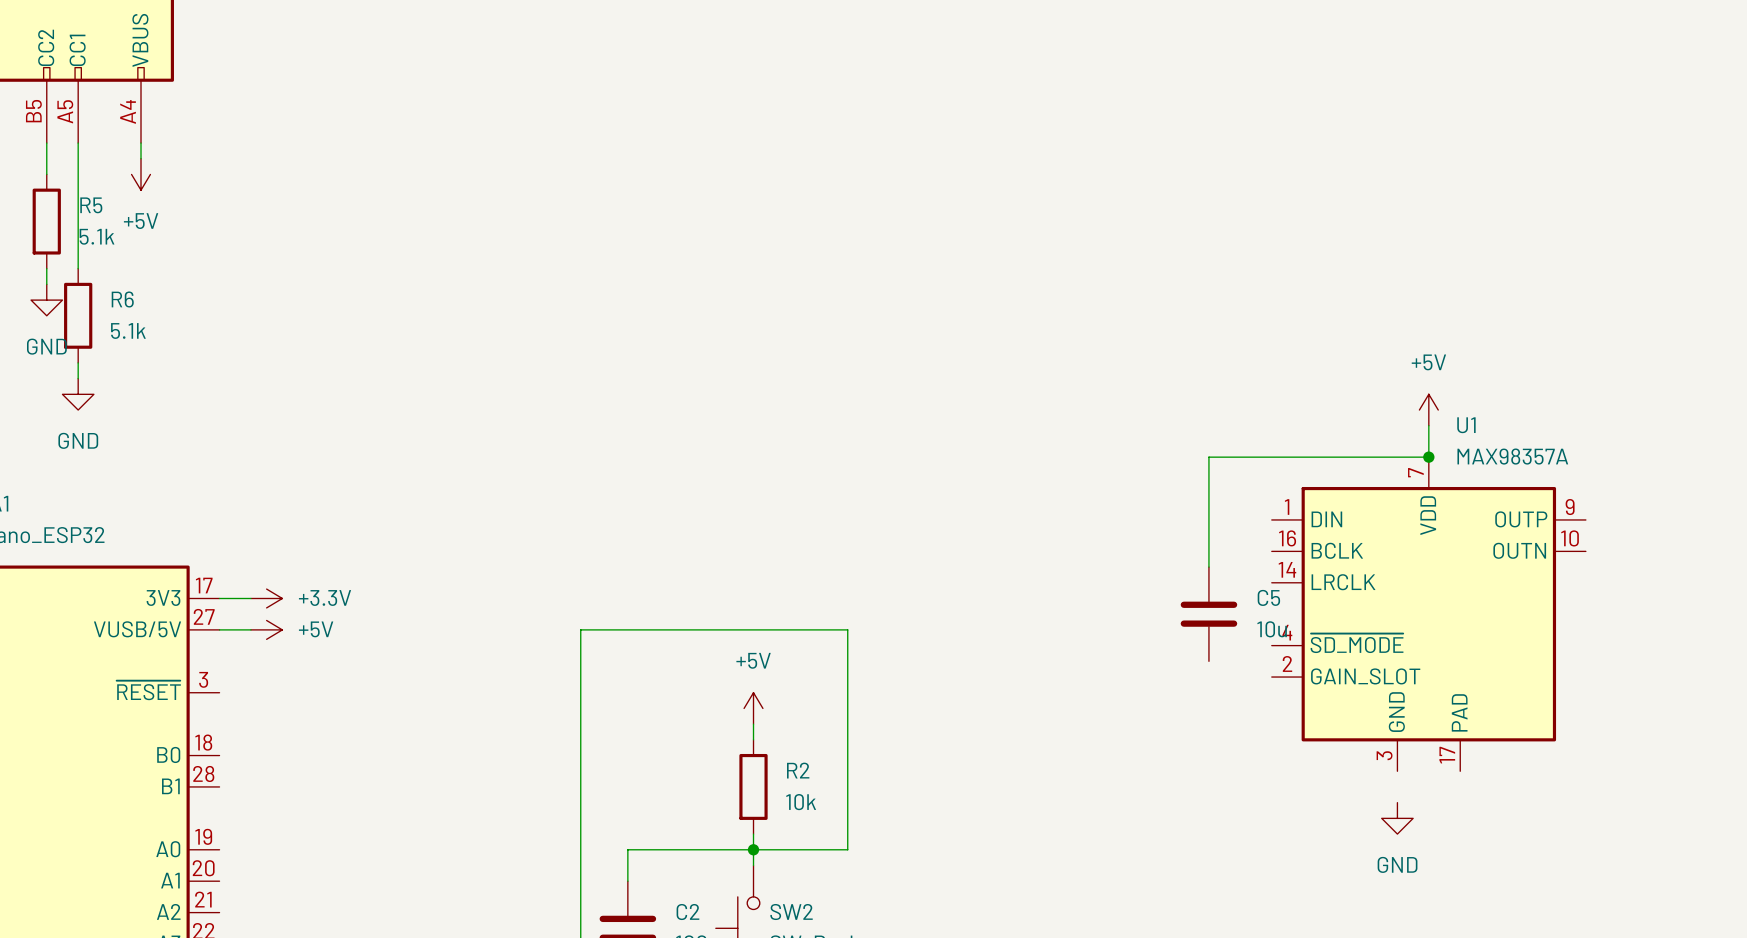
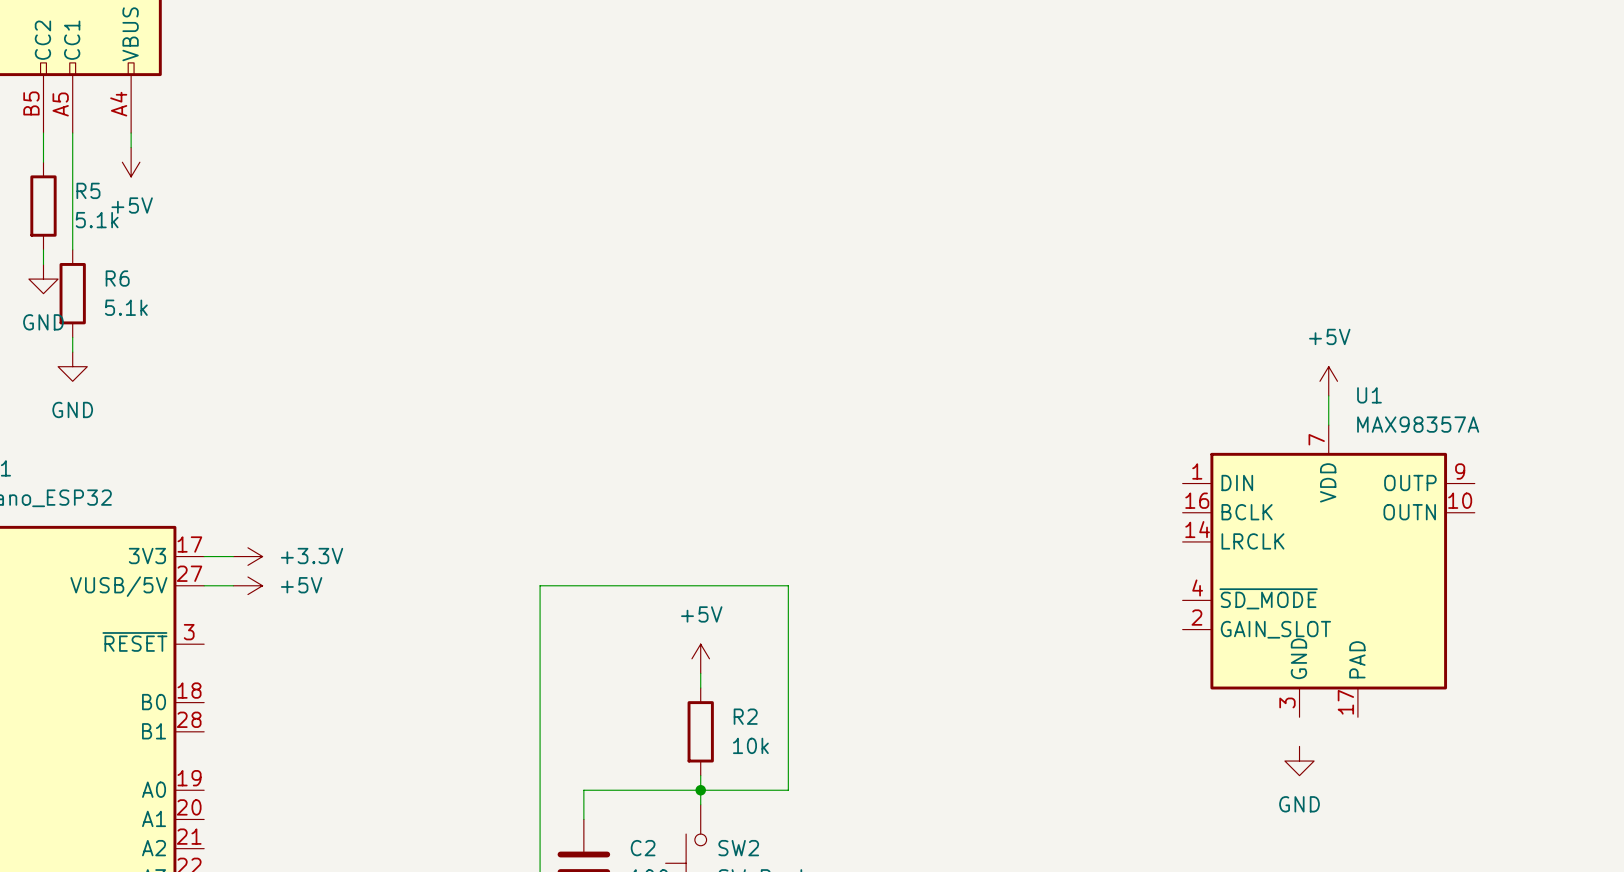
wire: (1428, 457) (1208, 457) (1208, 567) -> none
junction: (1428, 457) -> none
C5: 10u (1208, 614) -> none

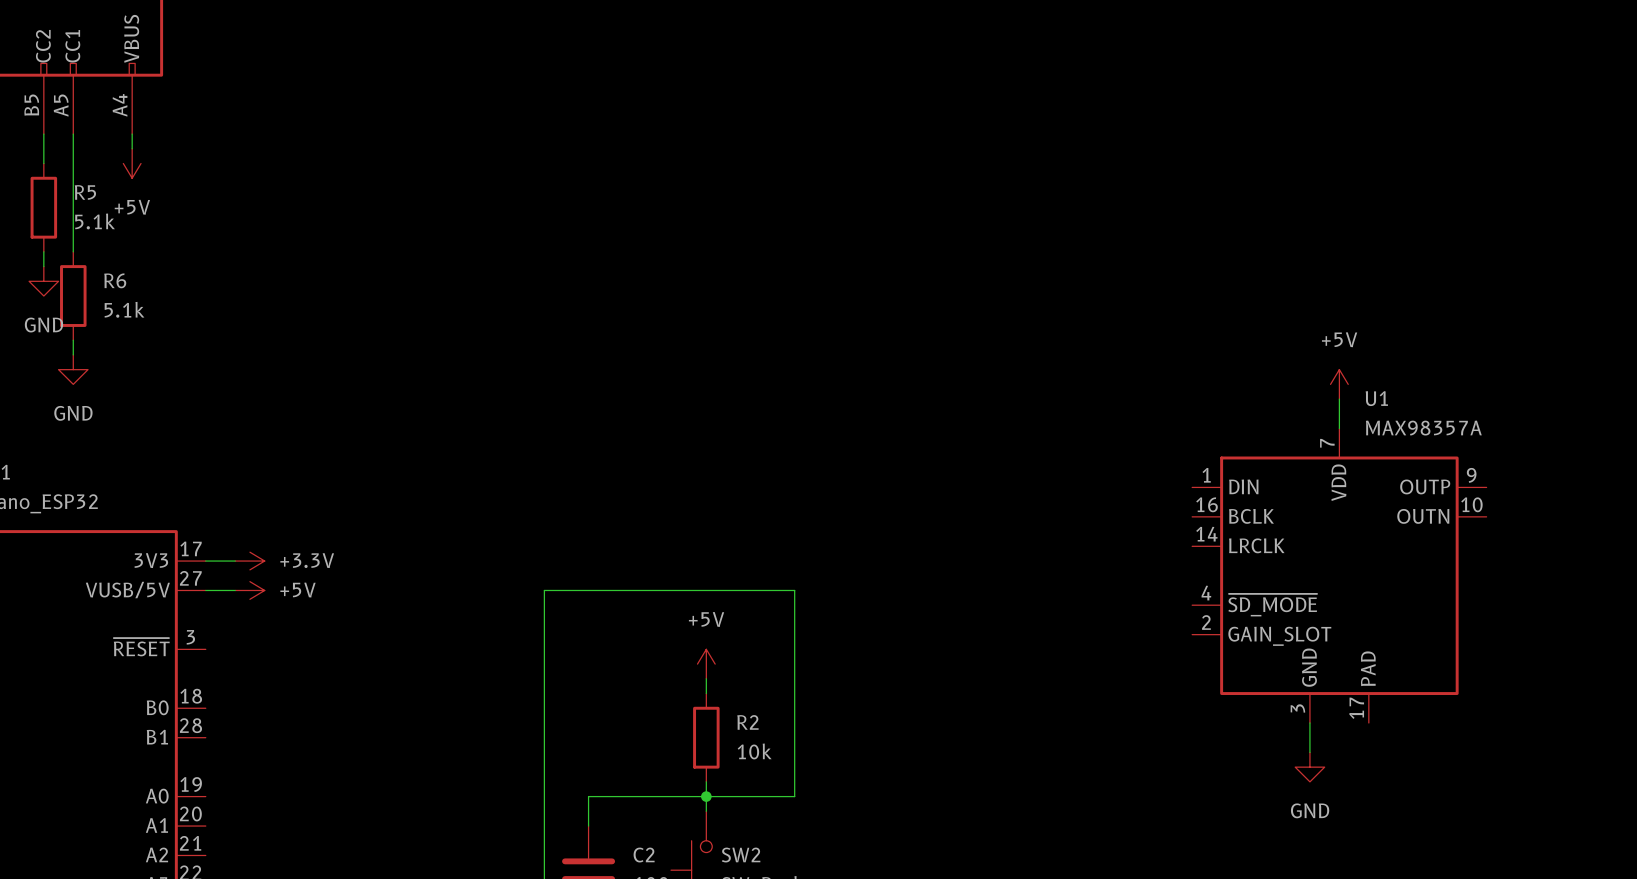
wire: none -> (1309, 722) (1309, 752)

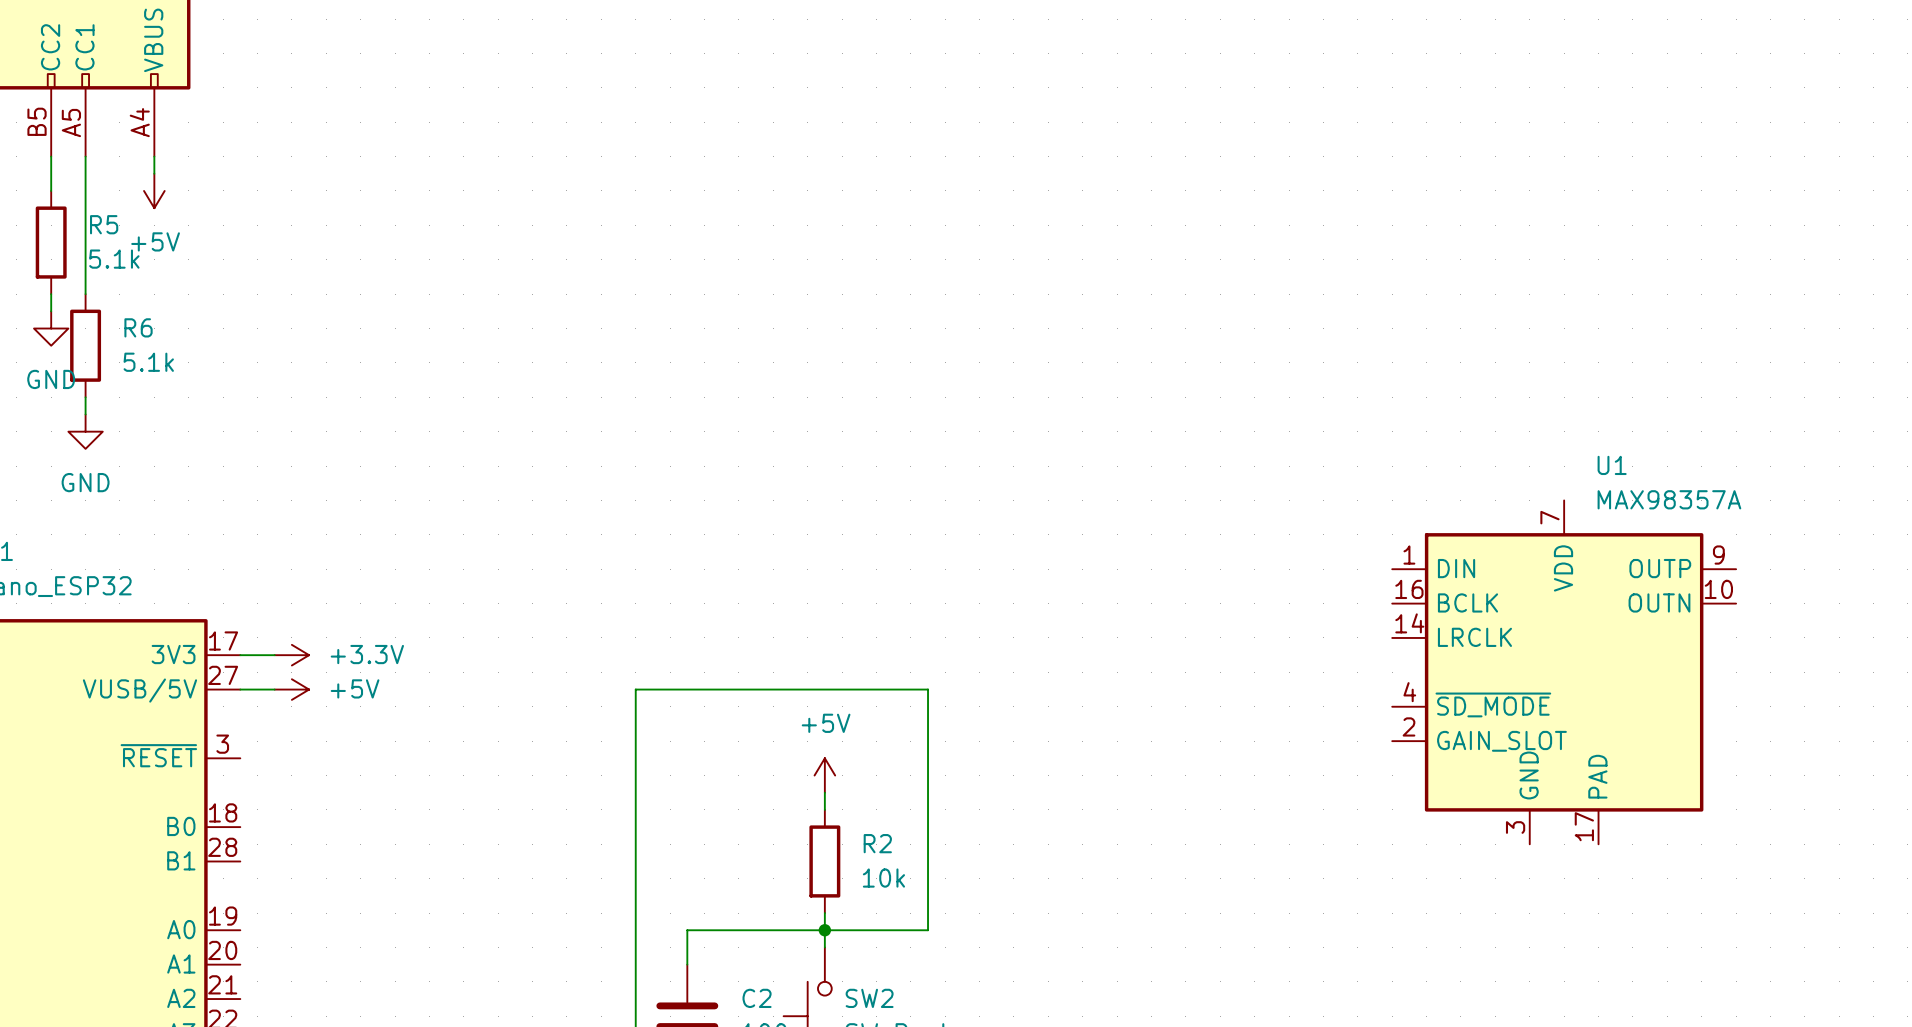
power symbol: +5V (1339, 384) -> none
wire: (1339, 399) (1339, 428) -> none
wire: (1309, 722) (1309, 752) -> none
power symbol: GND (1309, 767) -> none

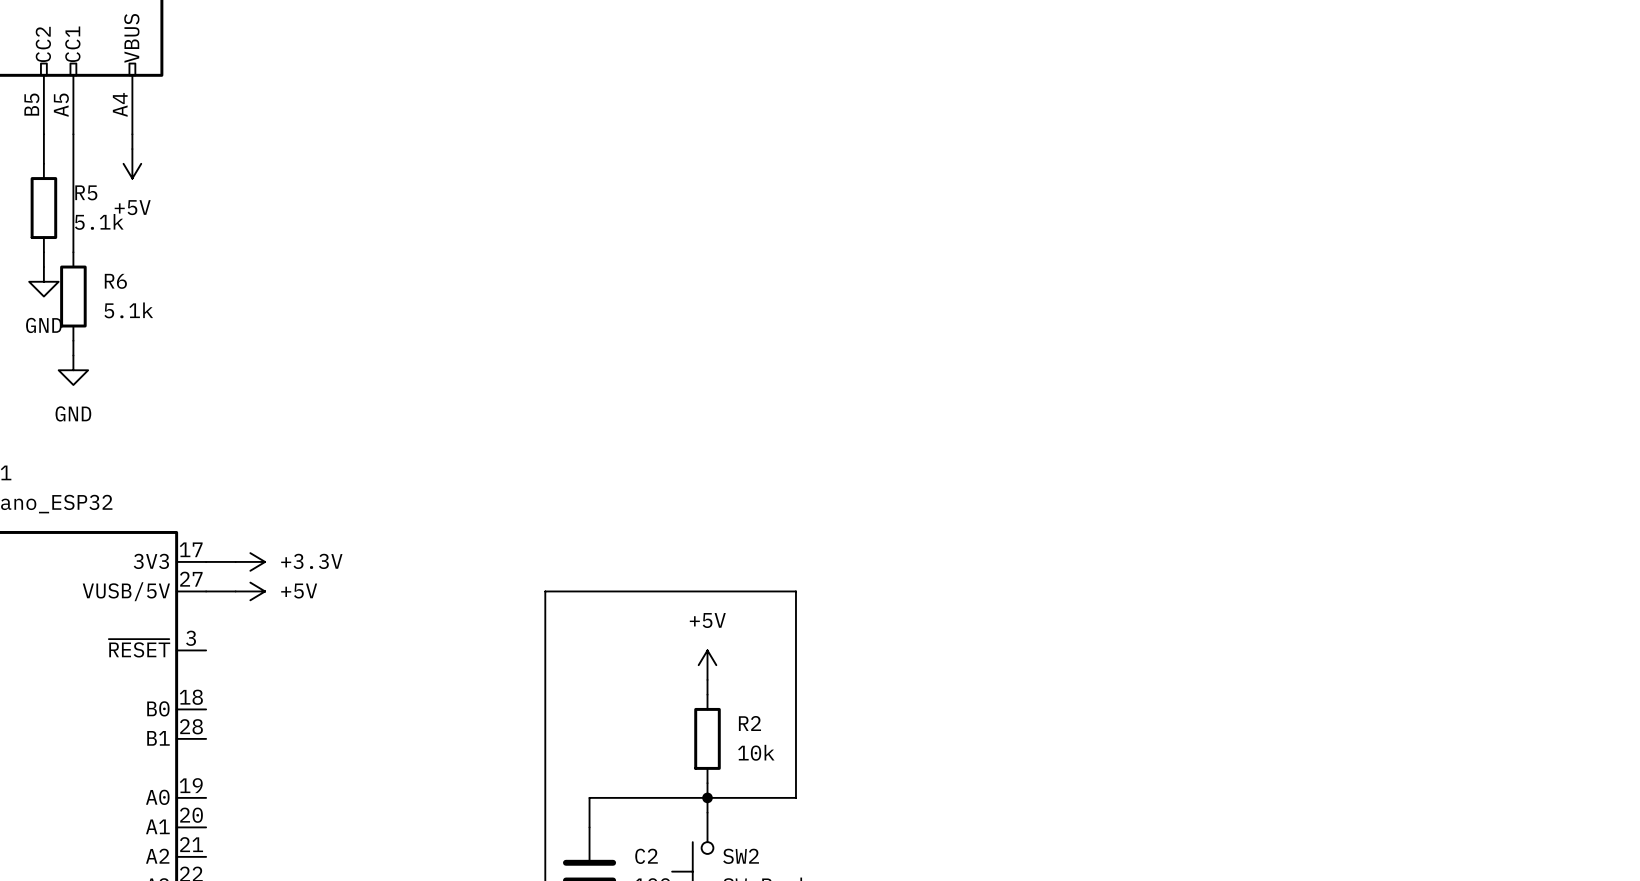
U1: MAX98357A (1564, 672) -> none

